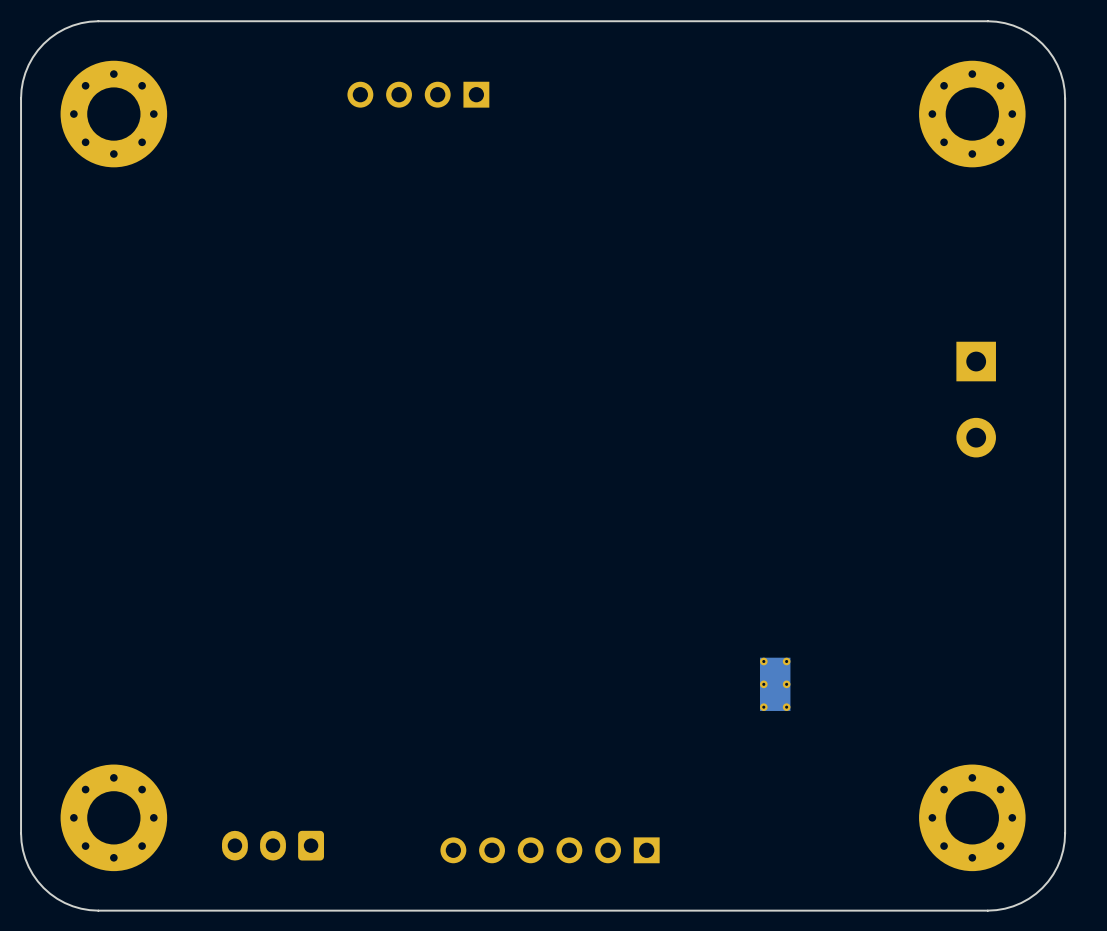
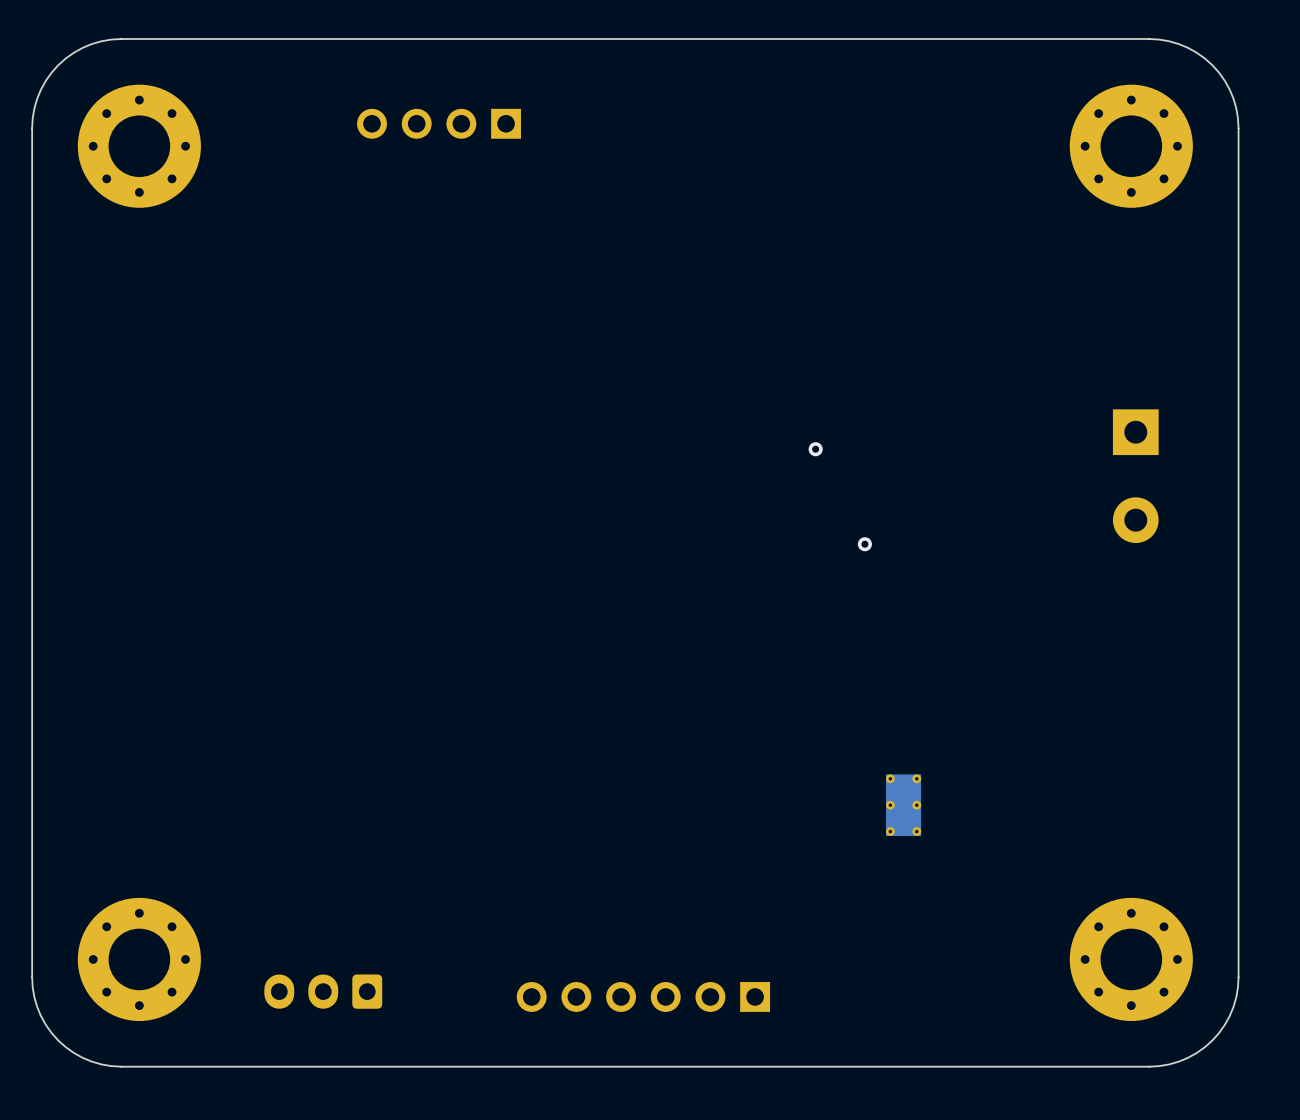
part position: (418, 94) -> (439, 123)
via: none -> (815, 449)
via: none -> (864, 544)

